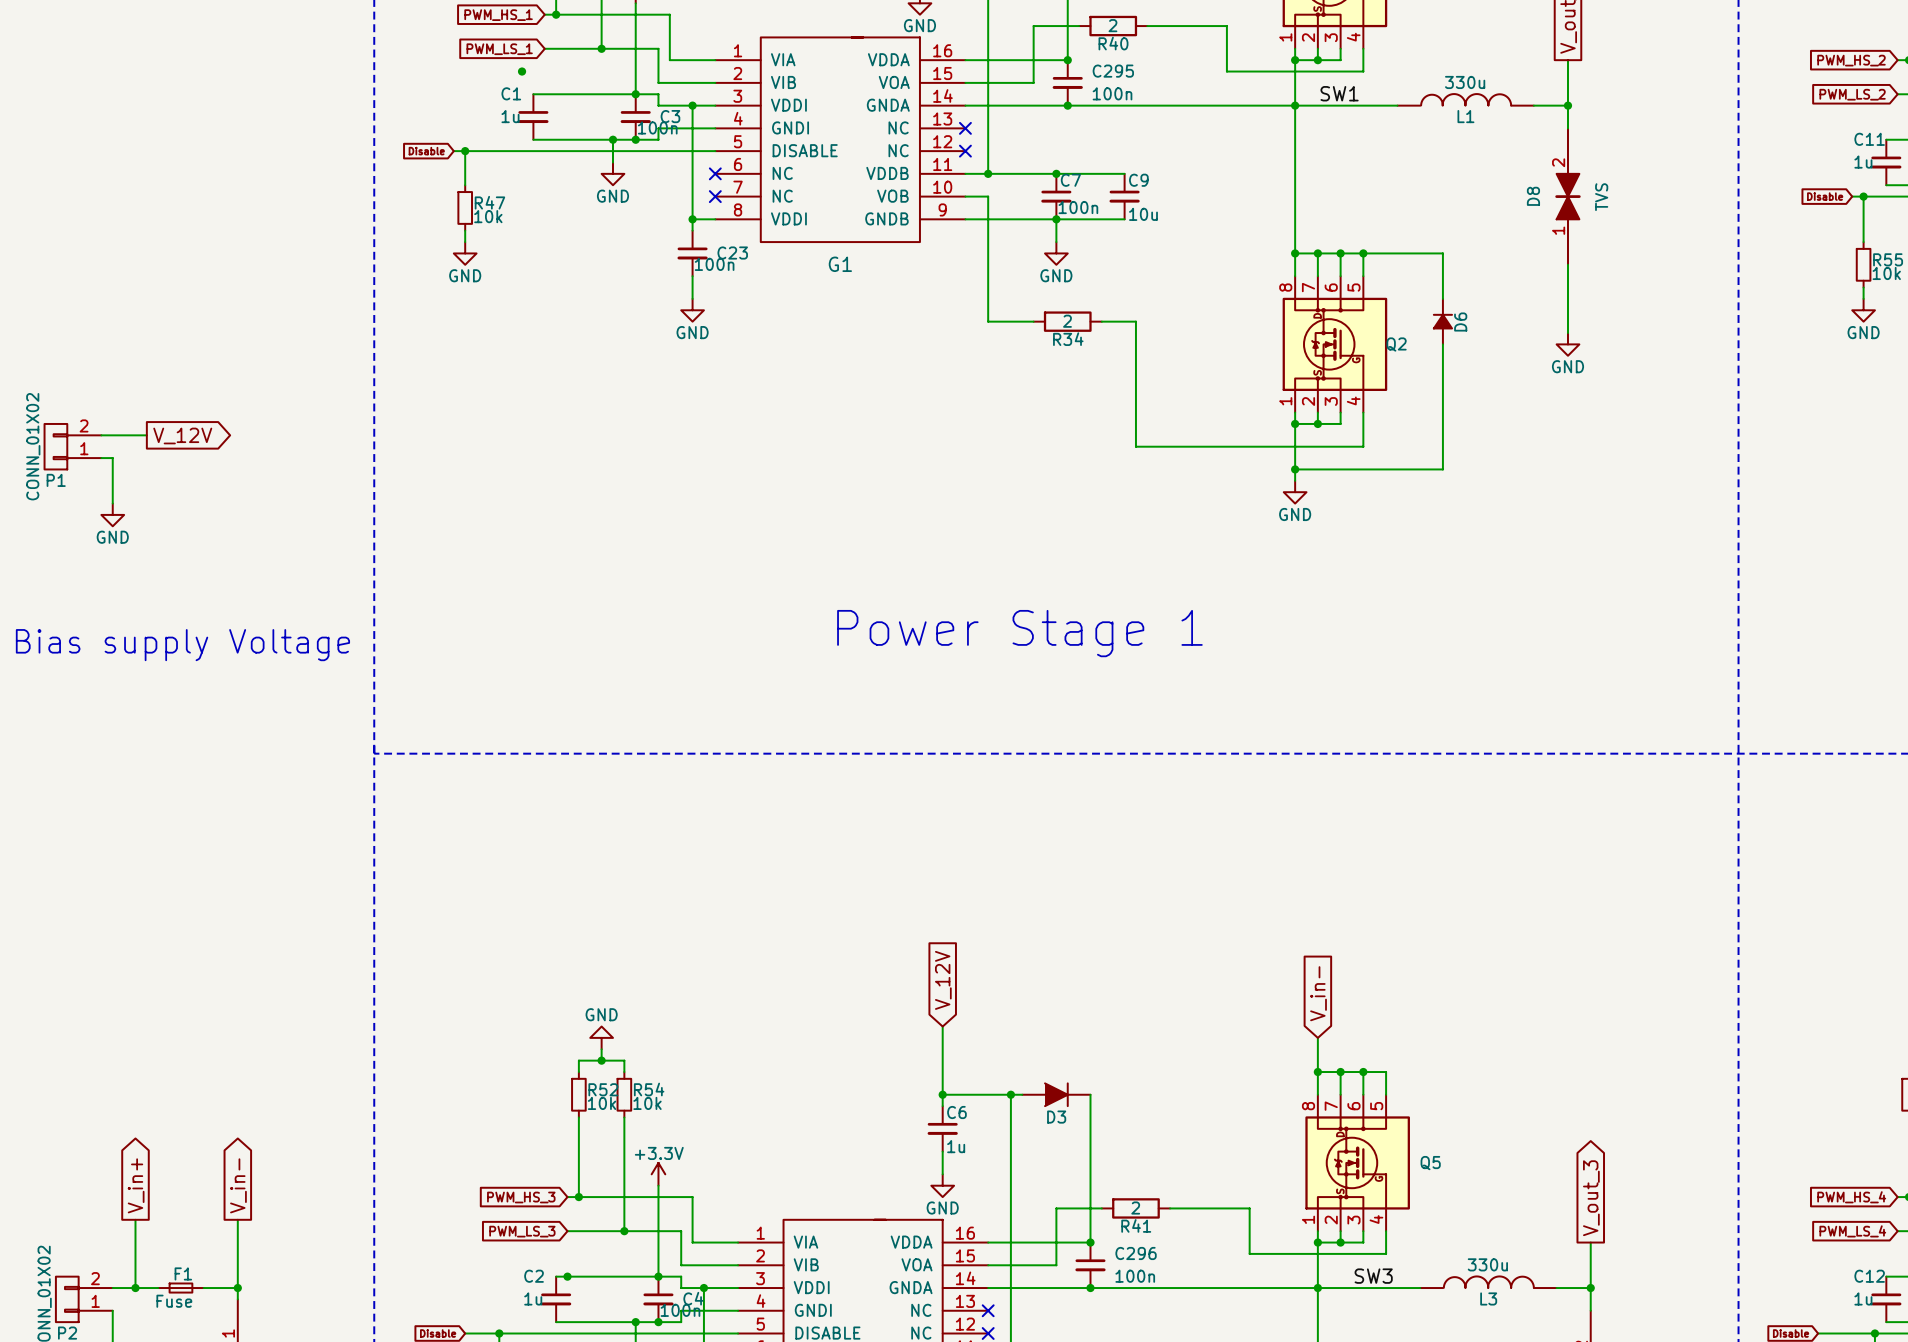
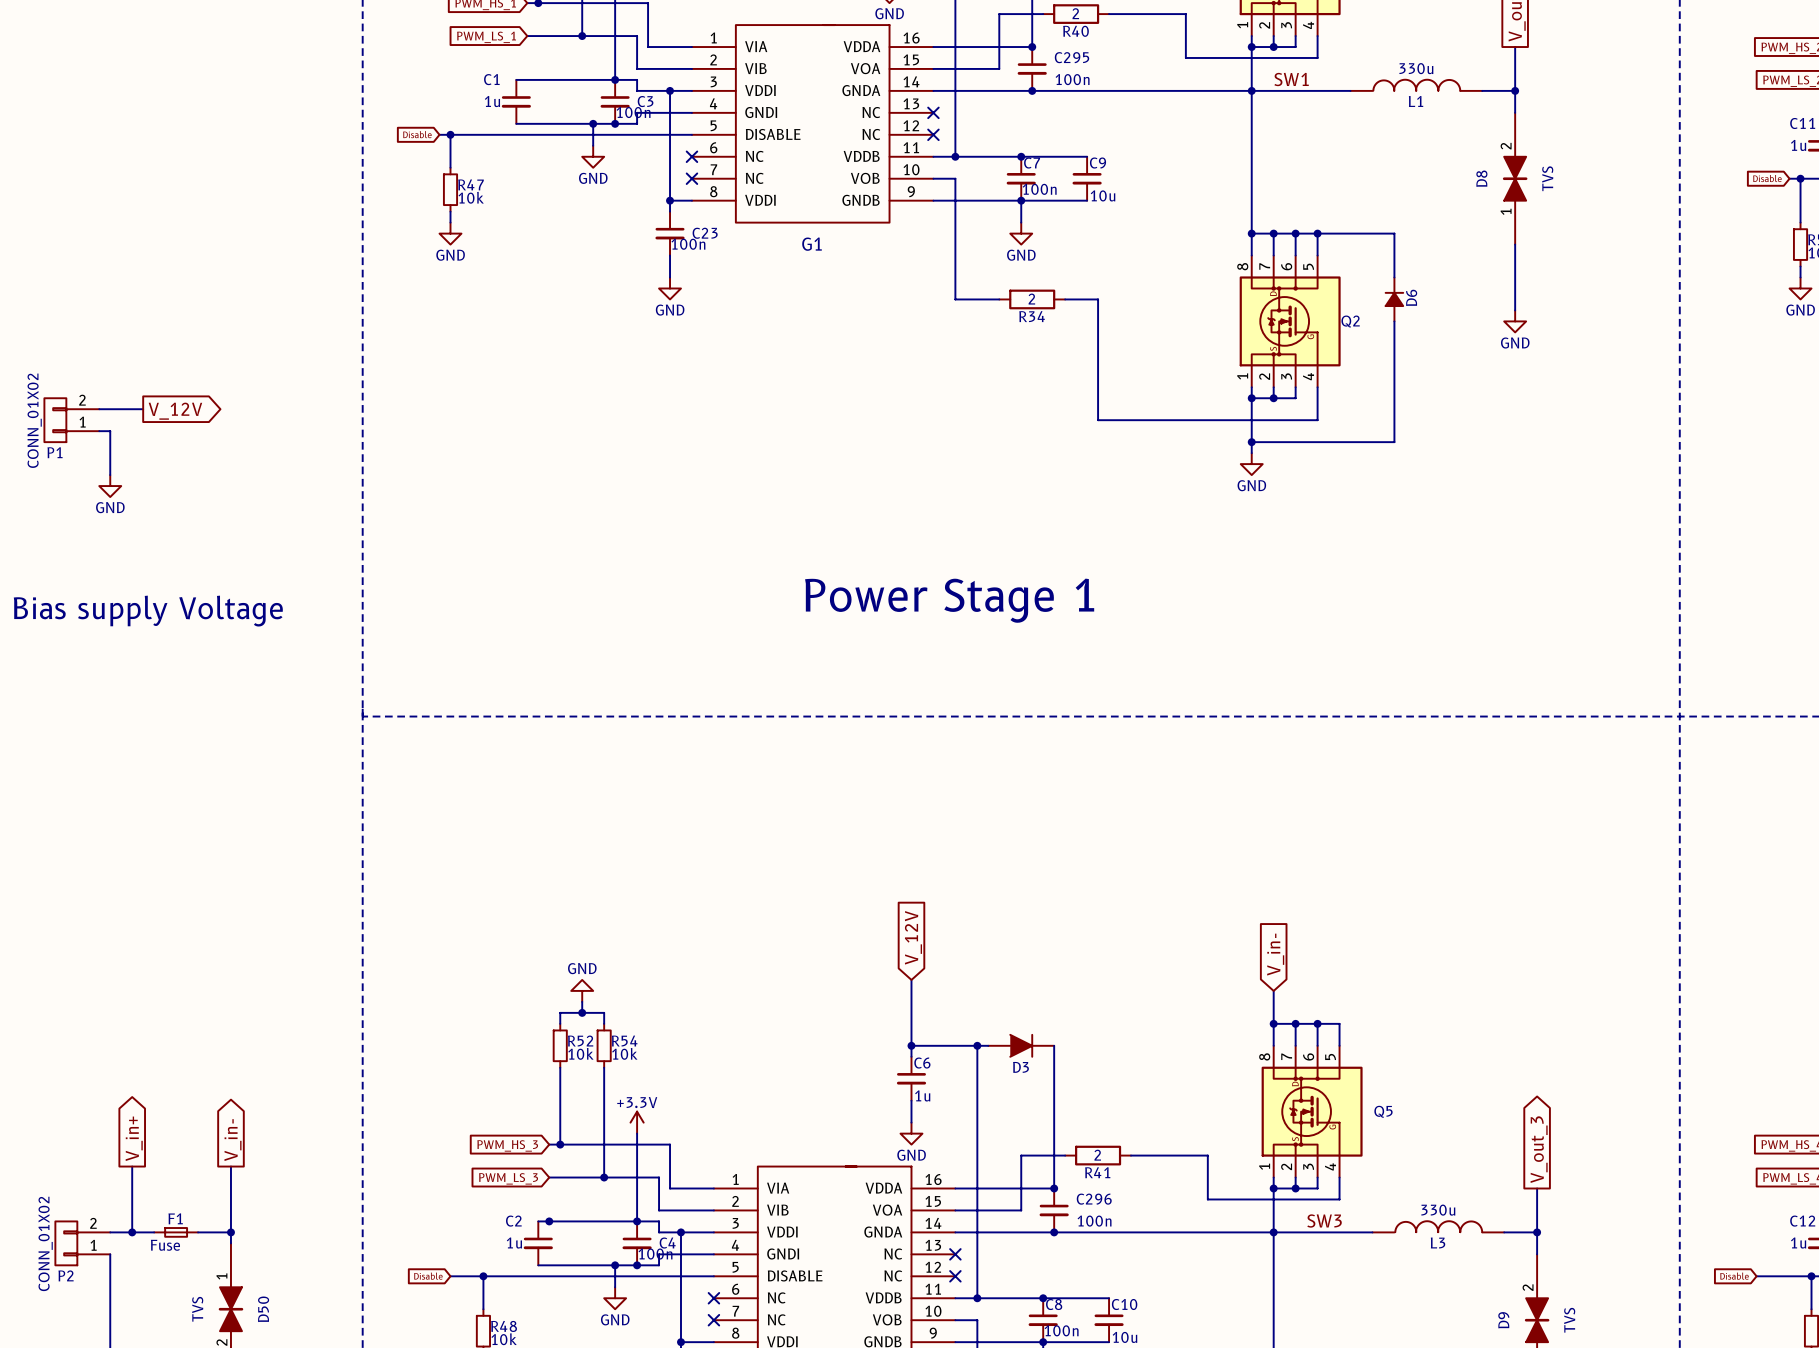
junction: (522, 71) -> none

